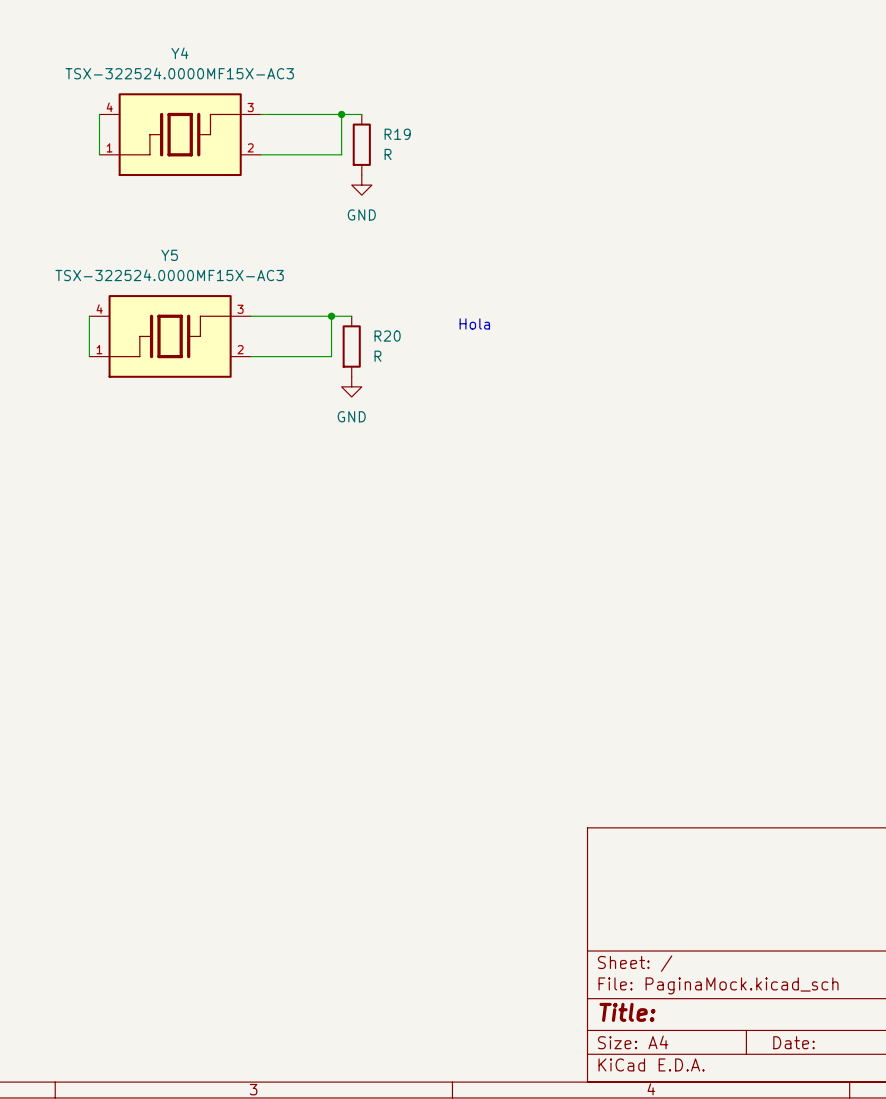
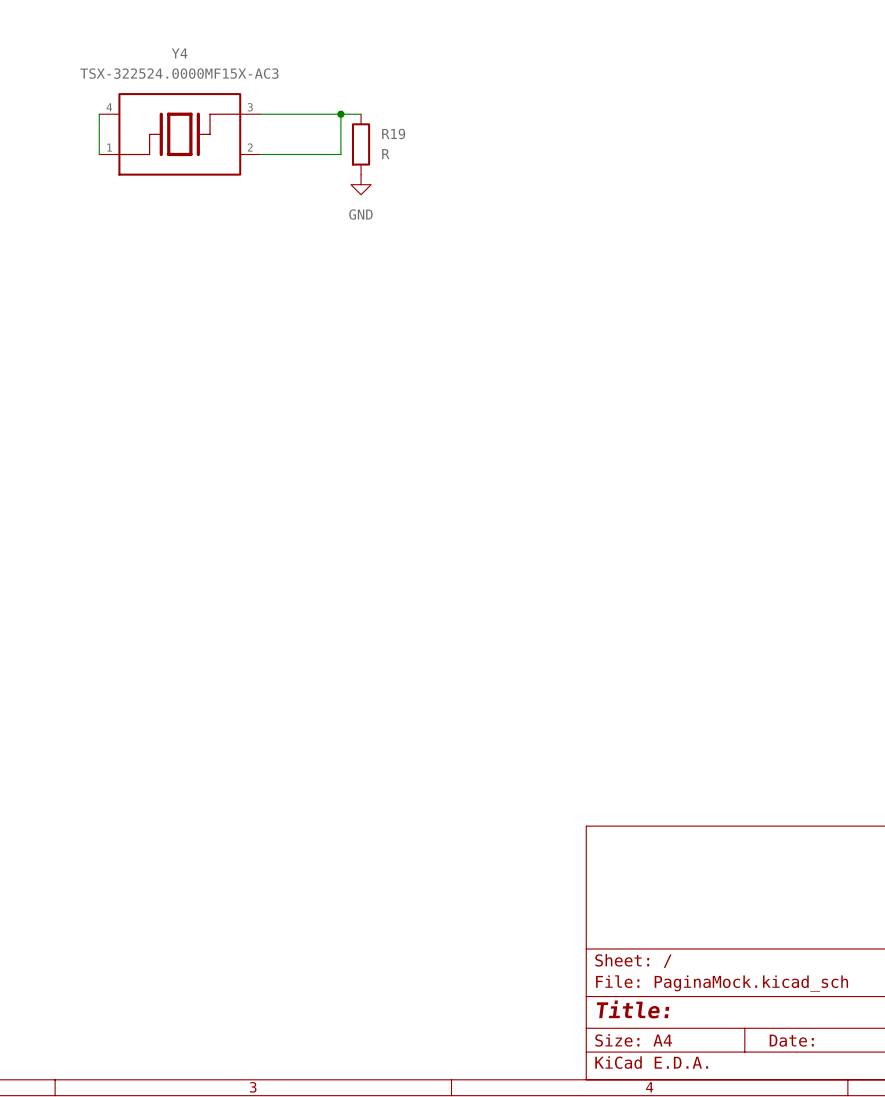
wire: (89, 316) (89, 356) -> none
wire: (250, 316) (351, 316) -> none
wire: (331, 316) (331, 356) (250, 356) -> none
junction: (331, 316) -> none
text: Hola (474, 323) -> none
Y5: TSX-322524.0000MF15X-AC3 (170, 336) -> none
R20: R (351, 346) -> none
power symbol: GND (351, 386) -> none

